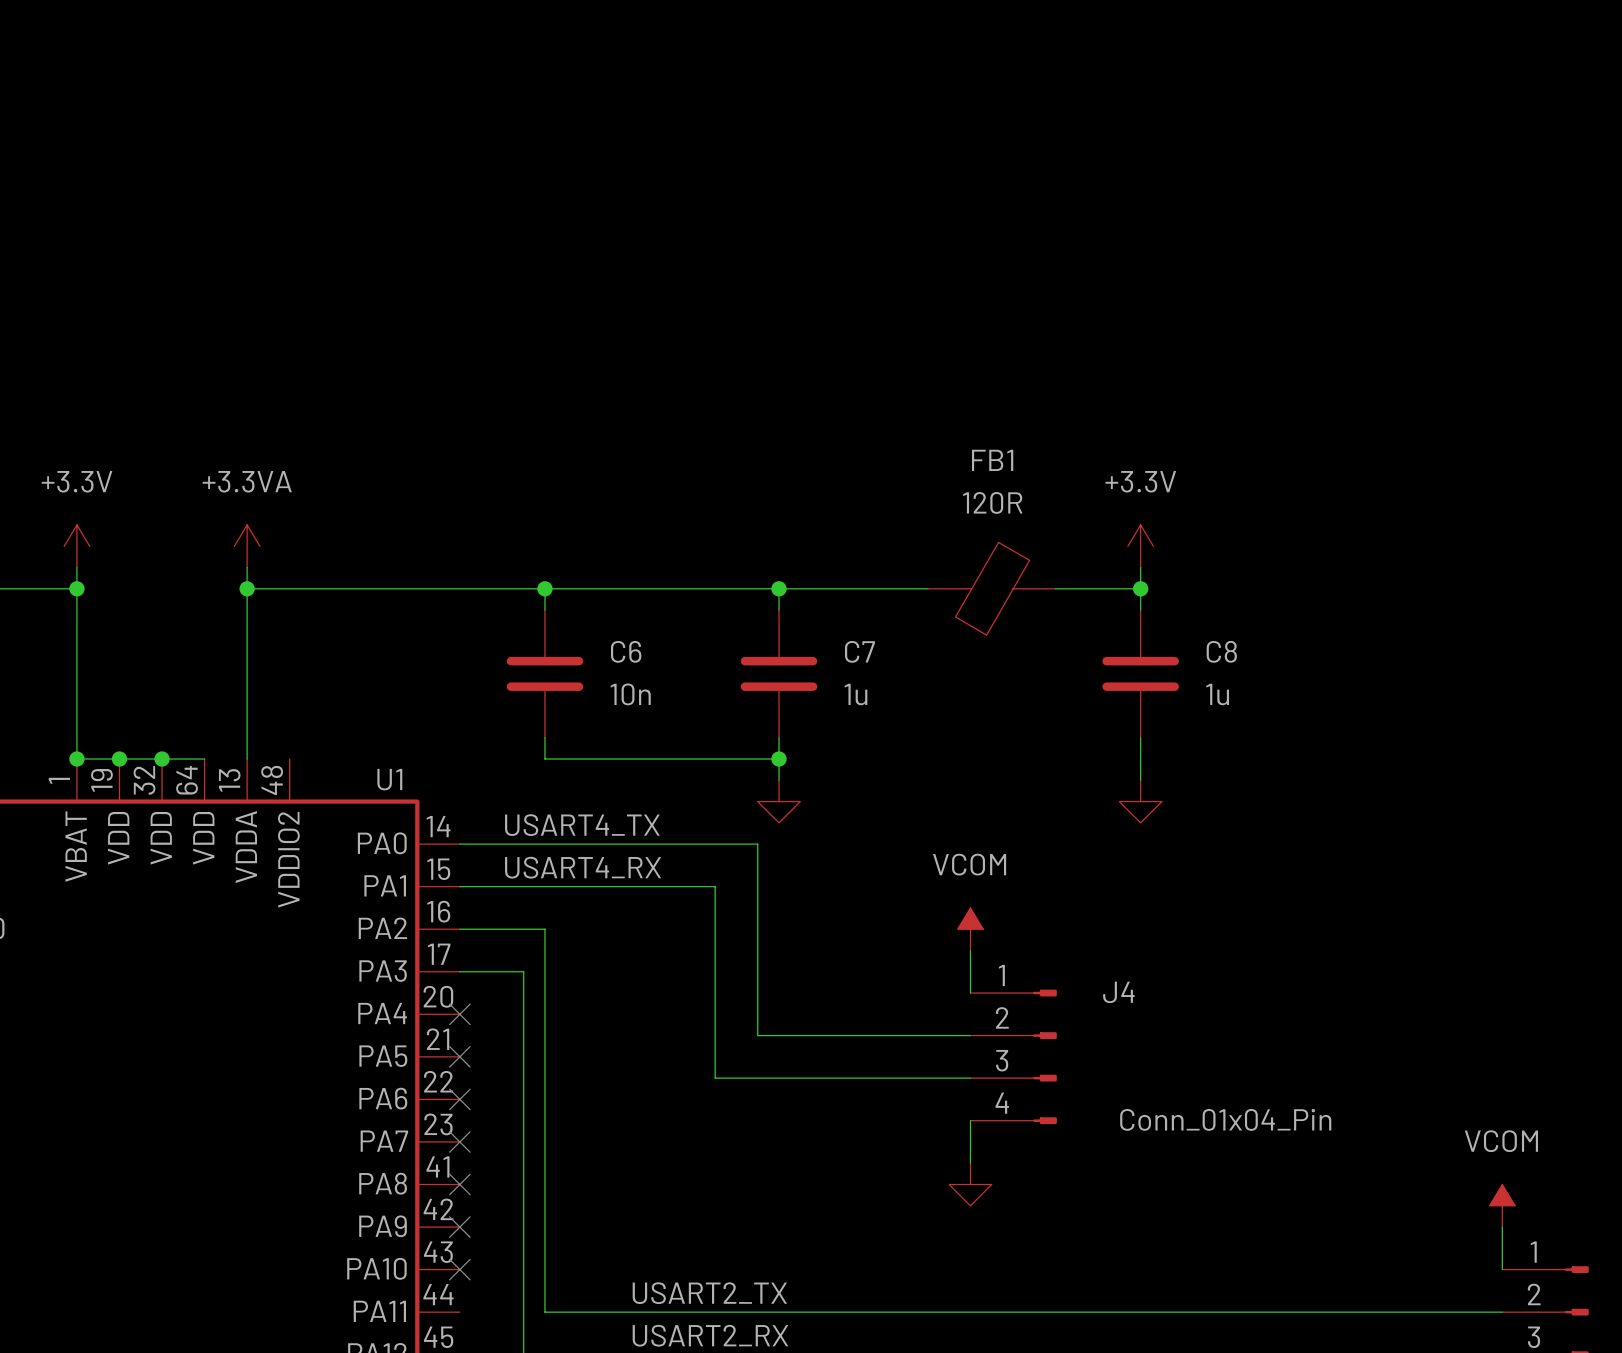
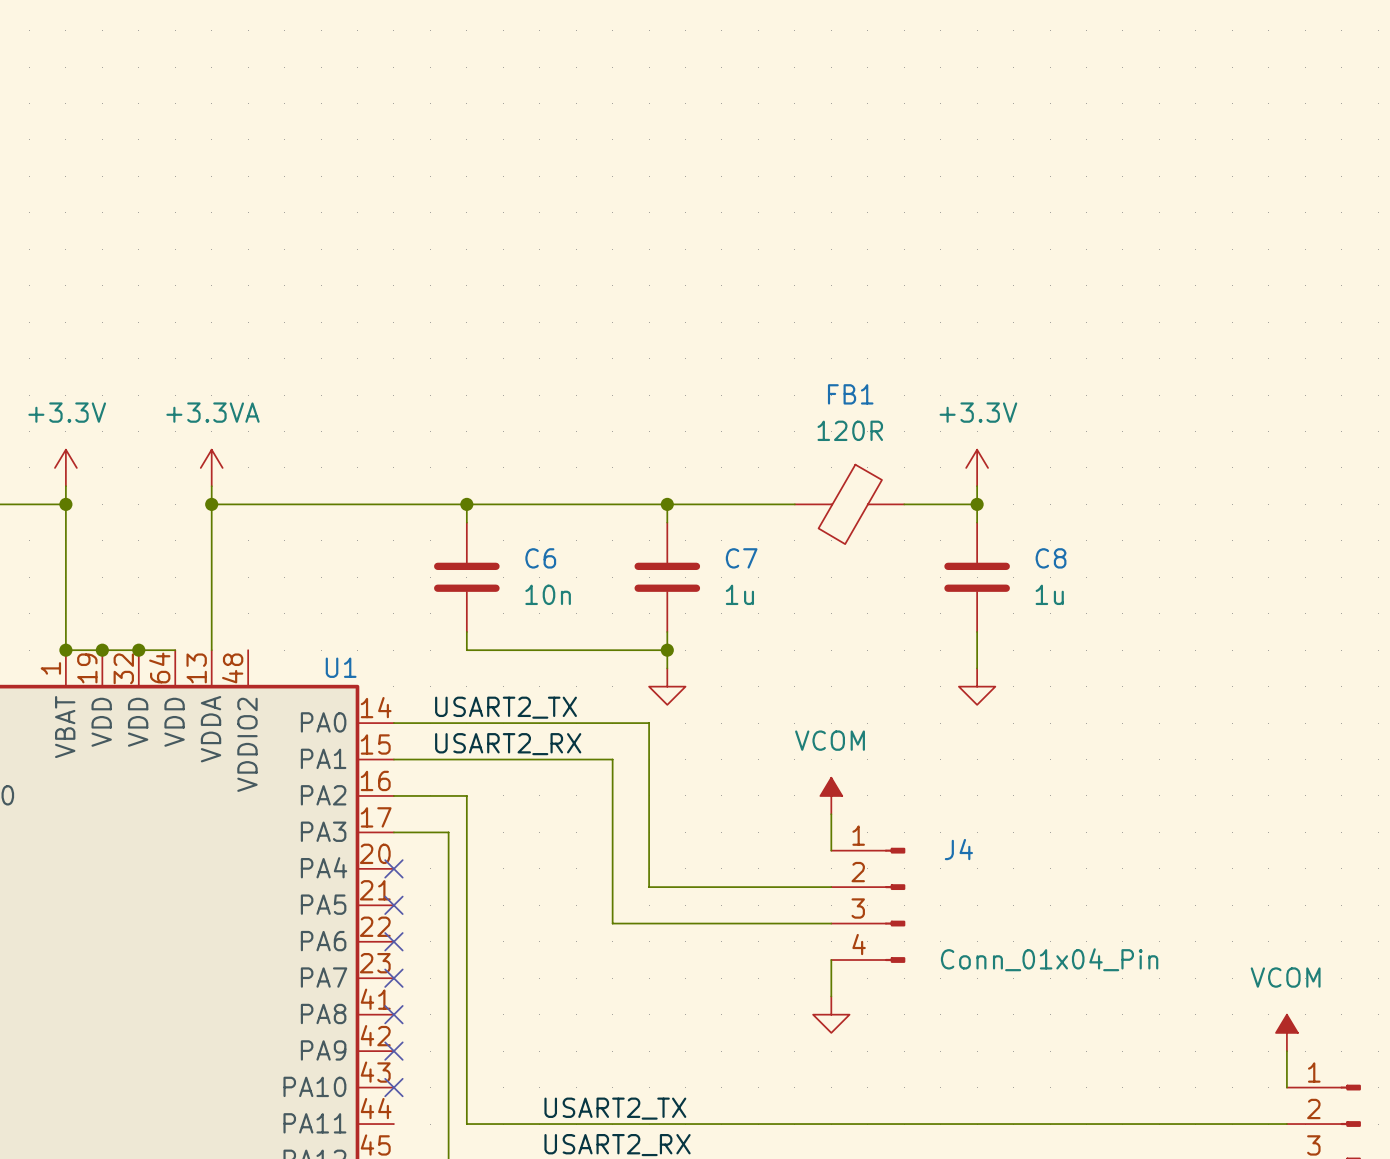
label: USART4_TX (582, 825) -> USART2_TX (506, 707)
label: USART4_RX (583, 867) -> USART2_RX (508, 744)

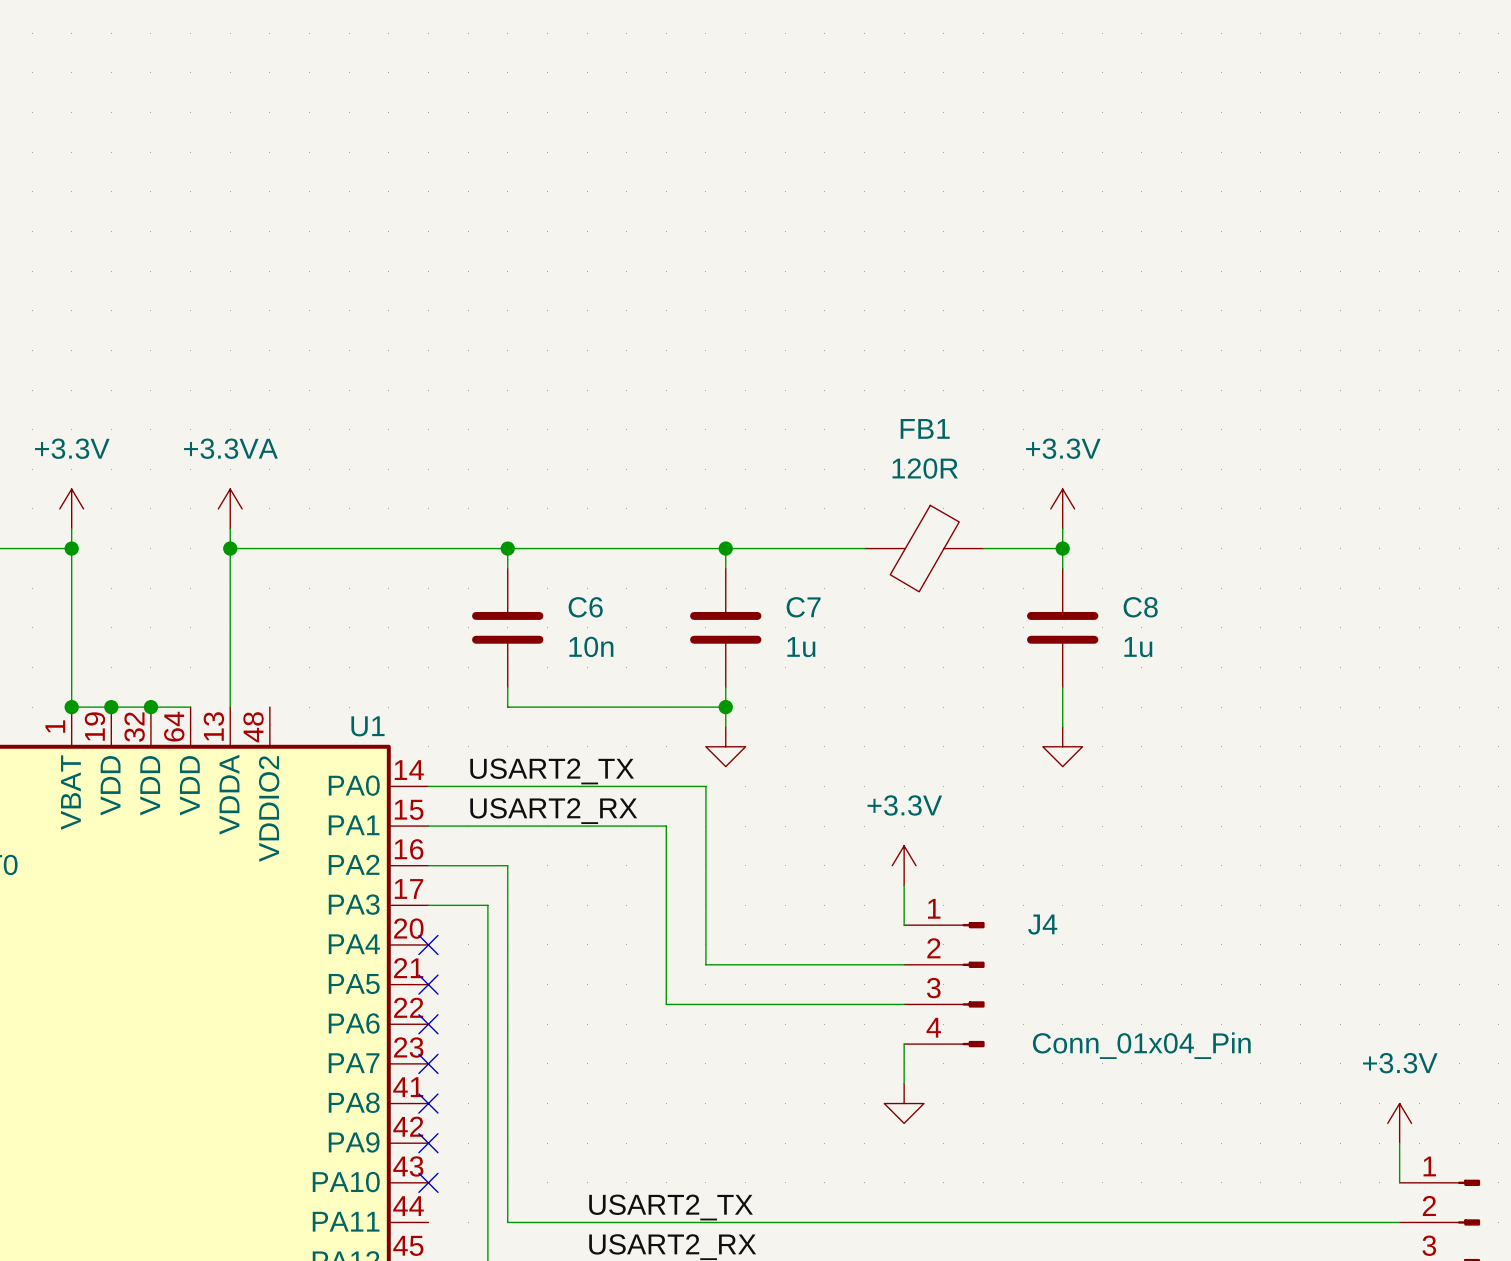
power symbol: VCOM (831, 795) -> +3.3V (904, 865)
power symbol: VCOM (1286, 1032) -> +3.3V (1399, 1123)

